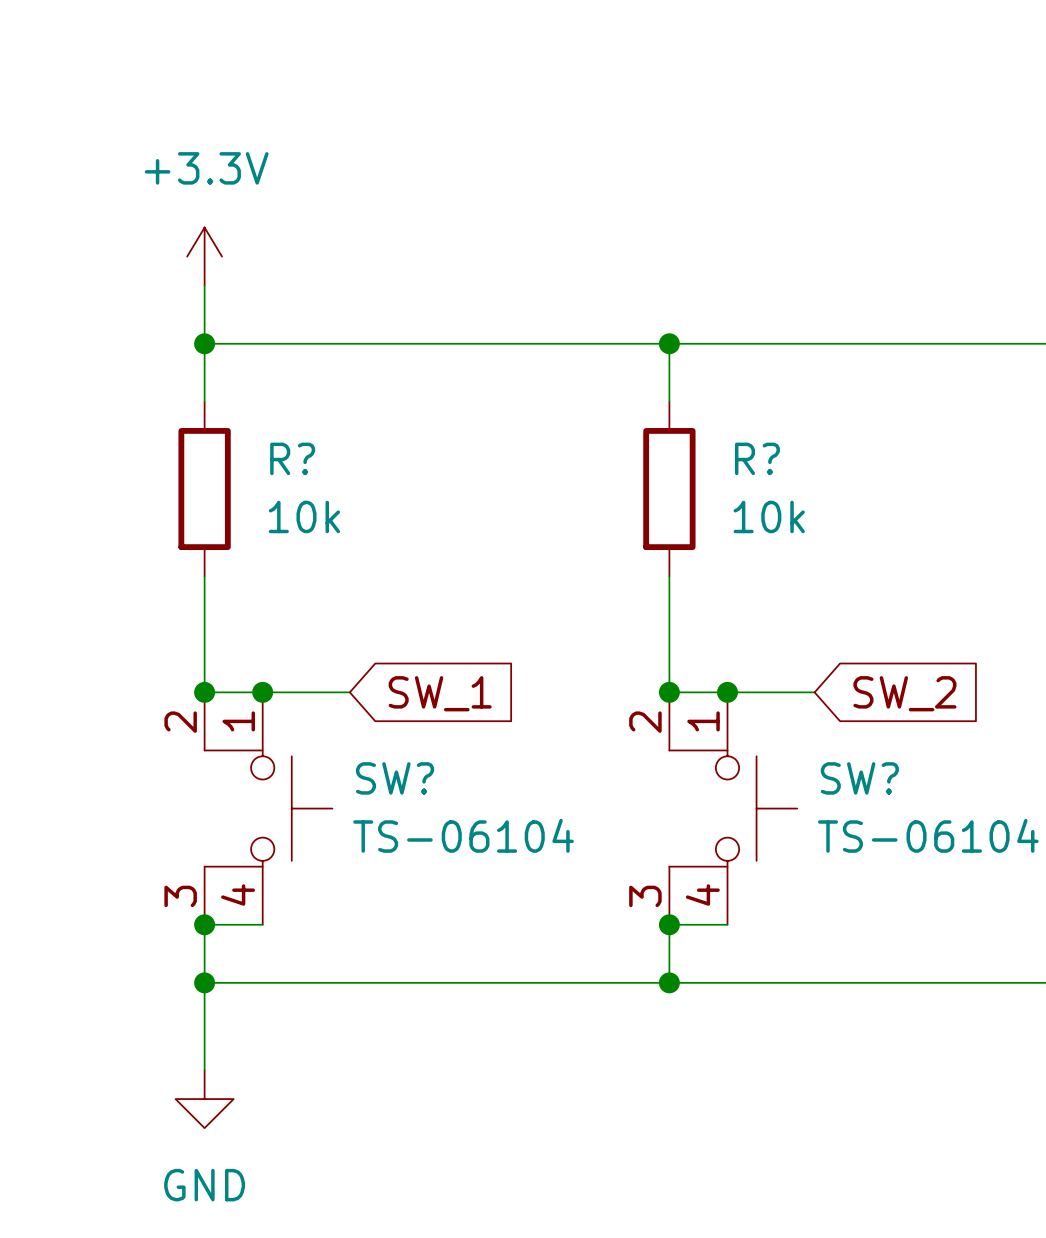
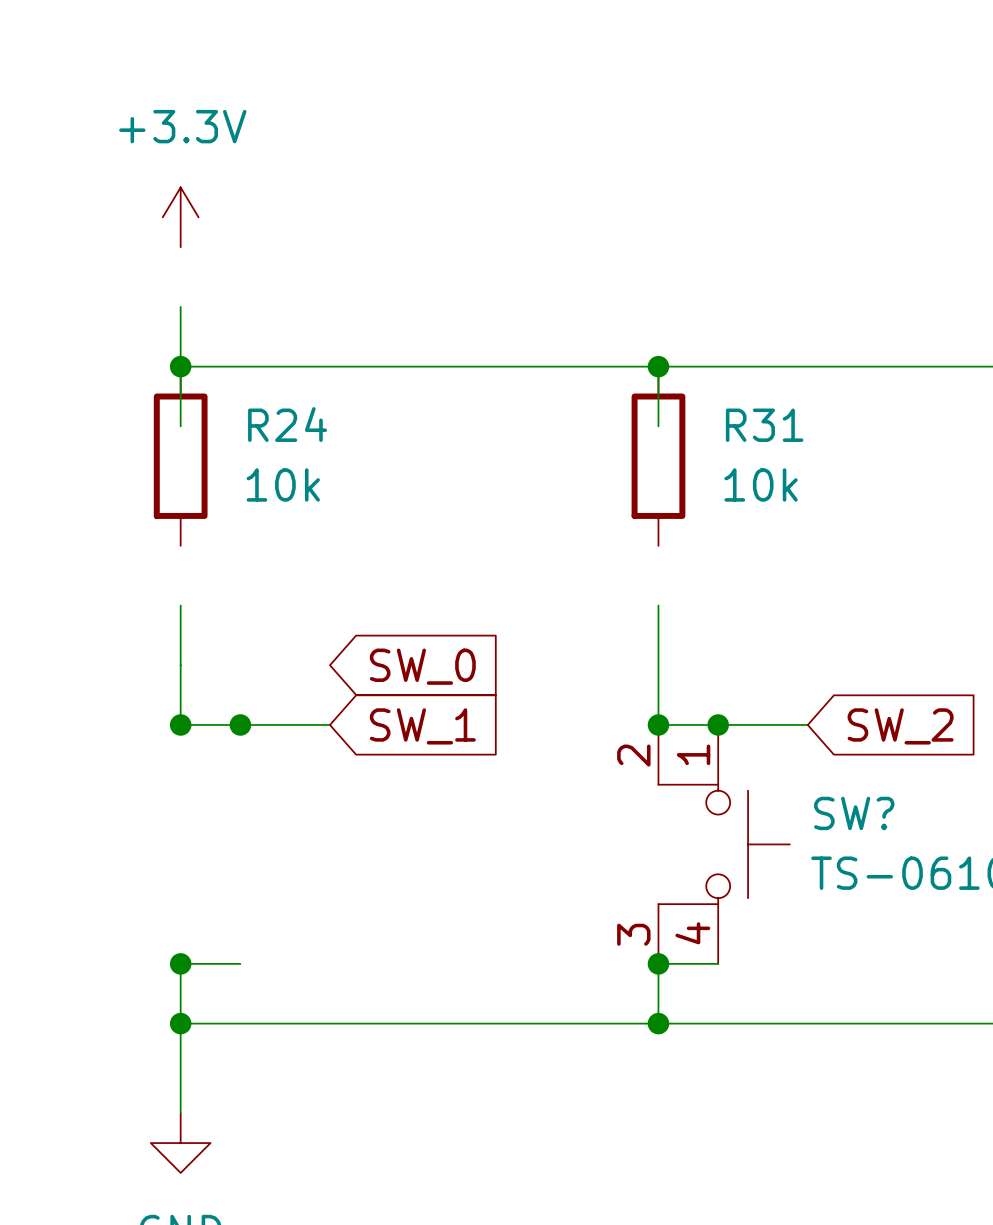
power symbol position: +3.3V (204, 256) -> +3.3V (180, 217)
R24: none -> 10k (180, 456)
R31: none -> 10k (658, 456)
R?: 10k (204, 489) -> none
R?: 10k (669, 489) -> none
global label: none -> SW_0 (422, 666)
SW?: TS-06104 (268, 808) -> none

